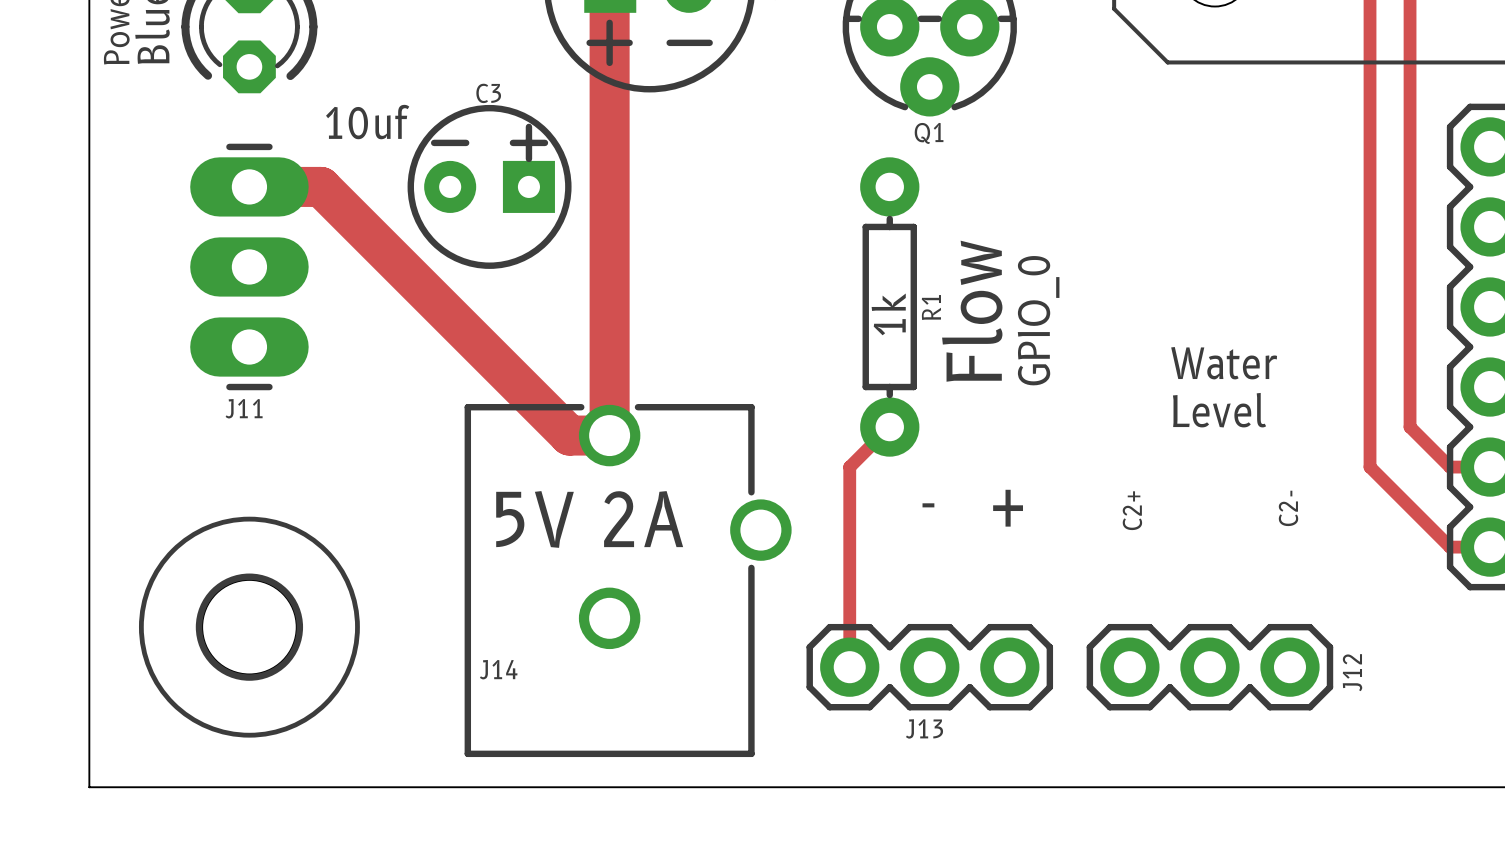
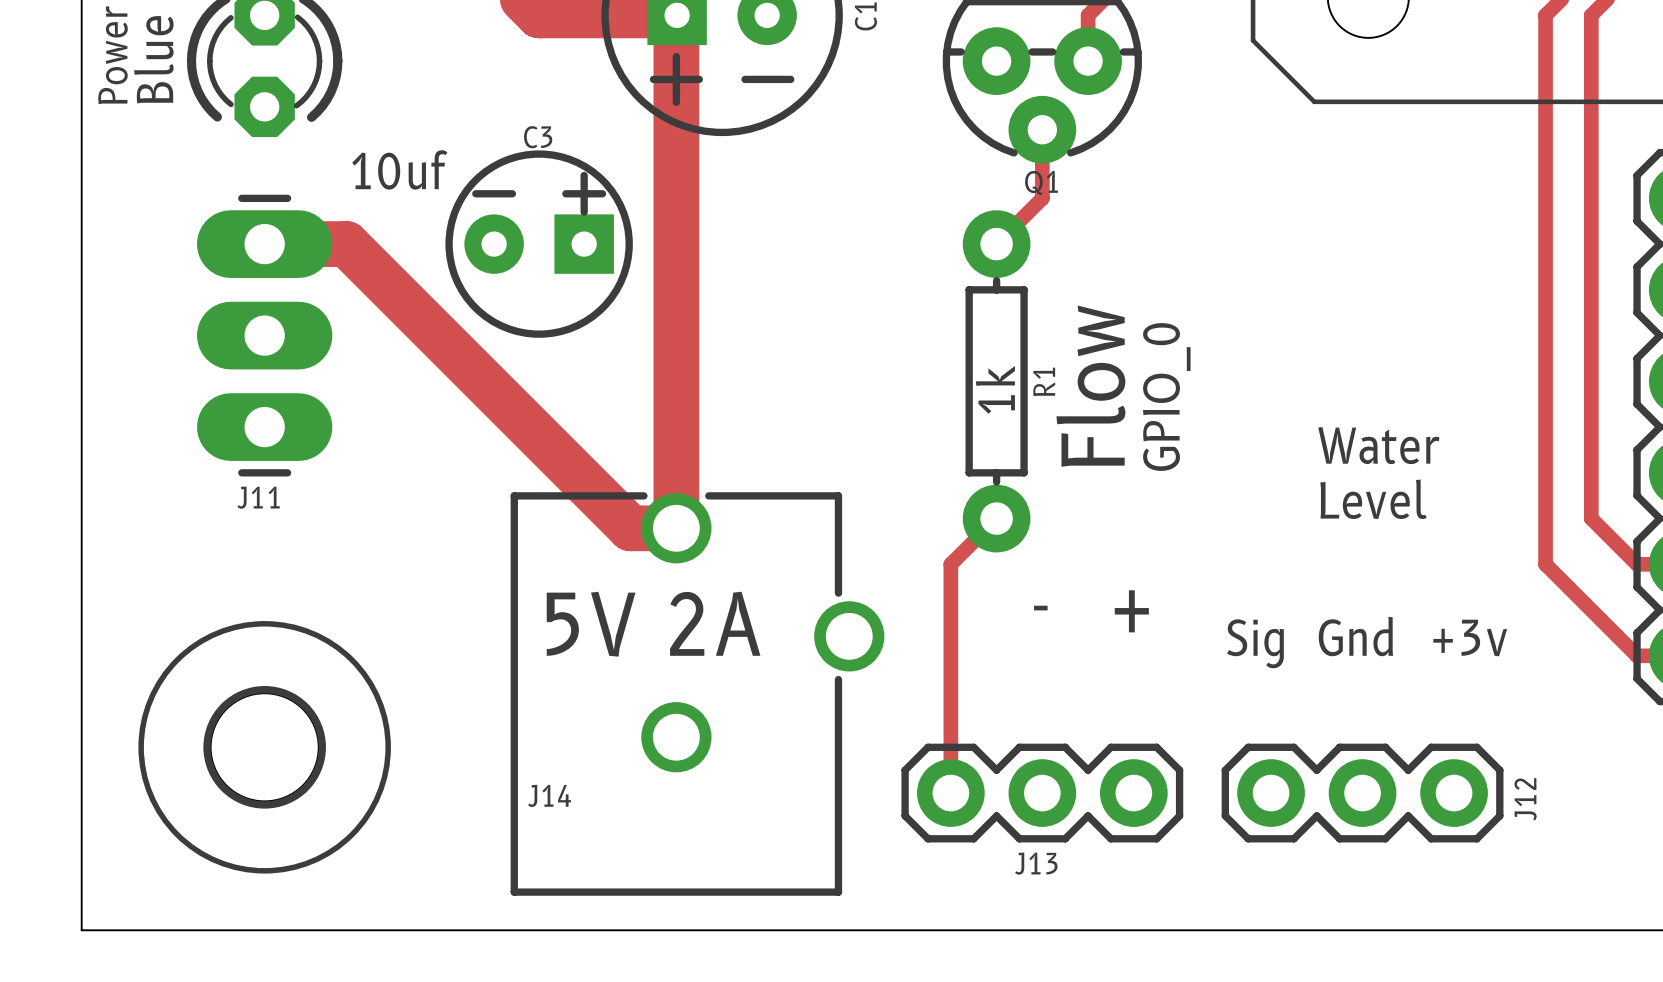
track: none -> (1042, 129) (1042, 198) (996, 244)
text: C2- (1288, 508) -> none
text: C2+ (1132, 510) -> none
text: none -> Gnd (1355, 636)
text: none -> +3v (1470, 638)
text: none -> Sig (1255, 643)

